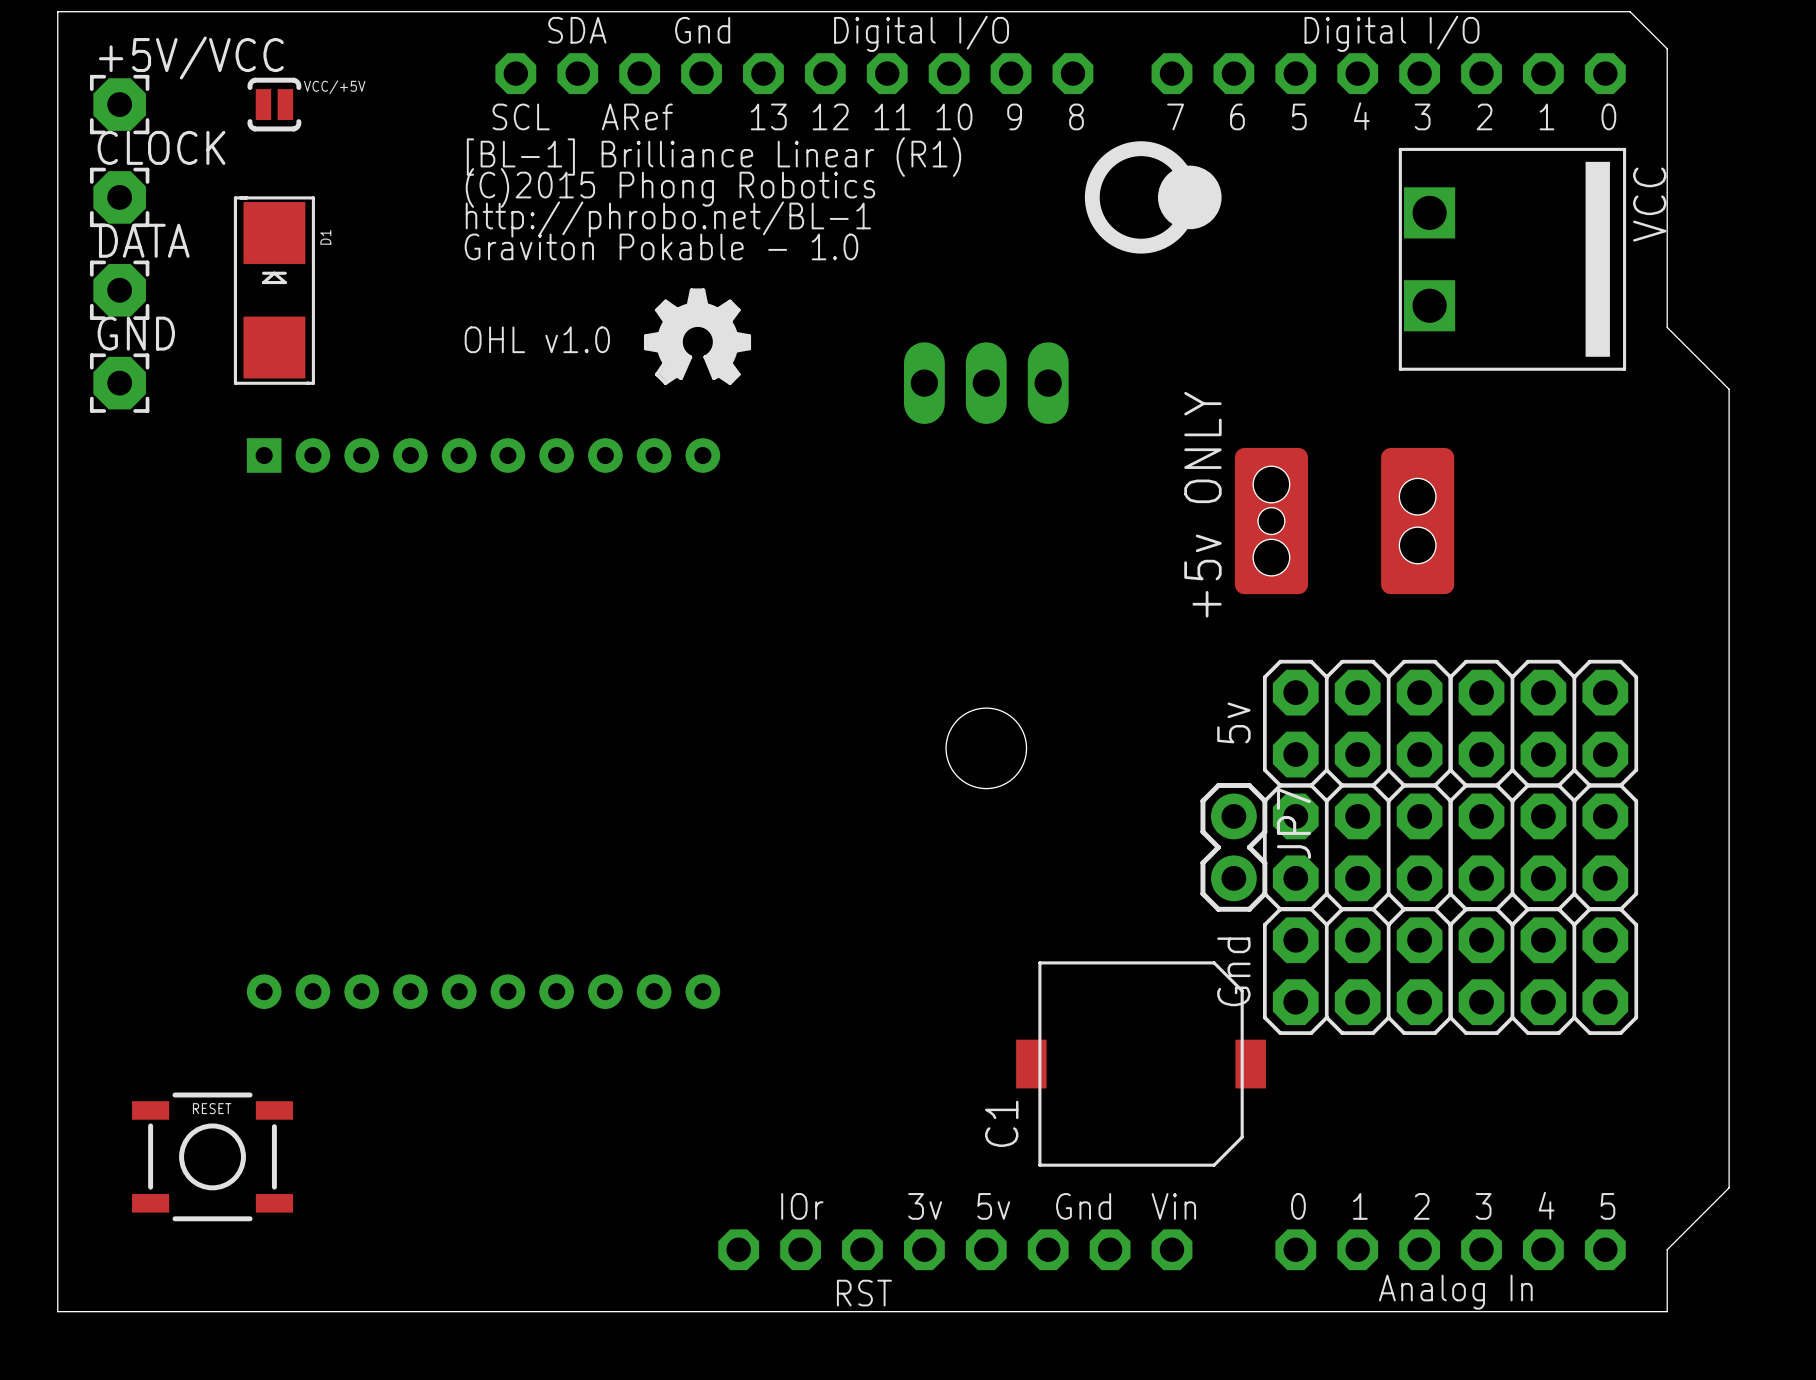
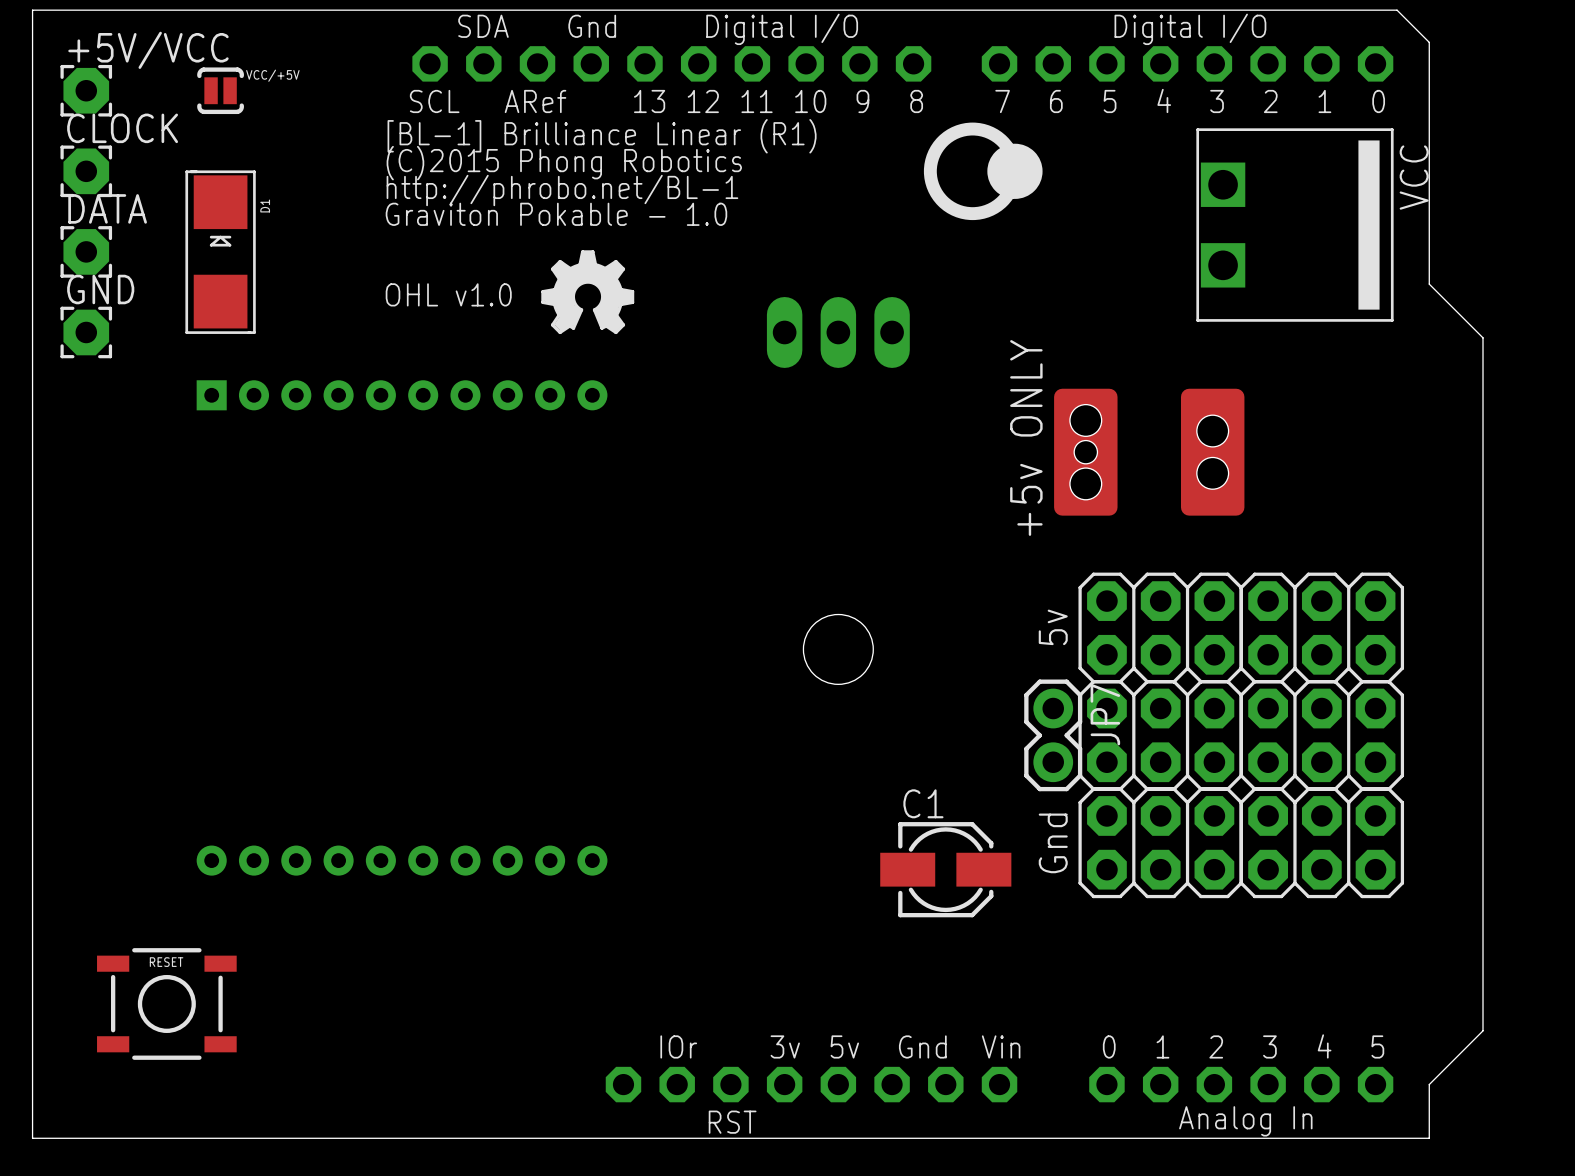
C1 footprint: [1016, 961, 1266, 1167] -> [880, 822, 1012, 918]
C1 name position: C1 (1001, 1123) -> C1 (923, 803)

